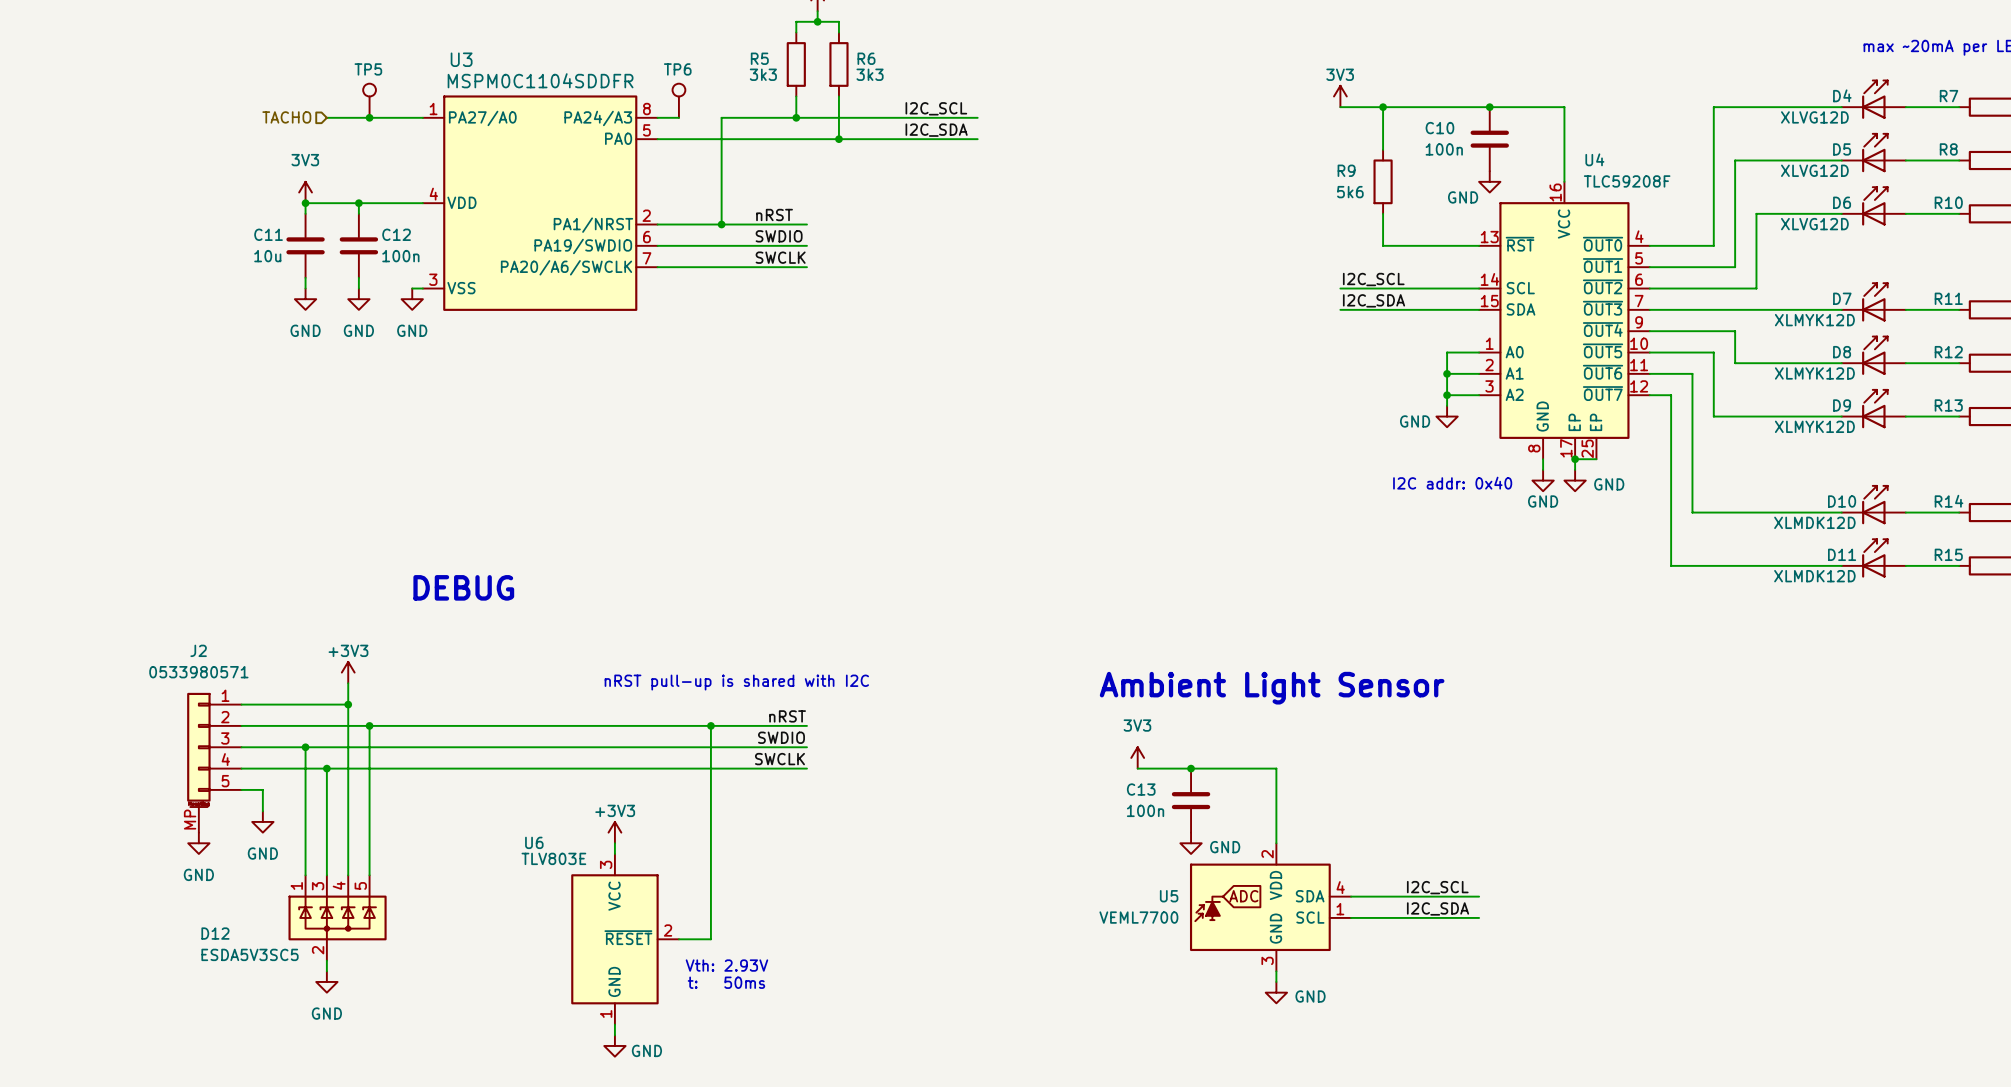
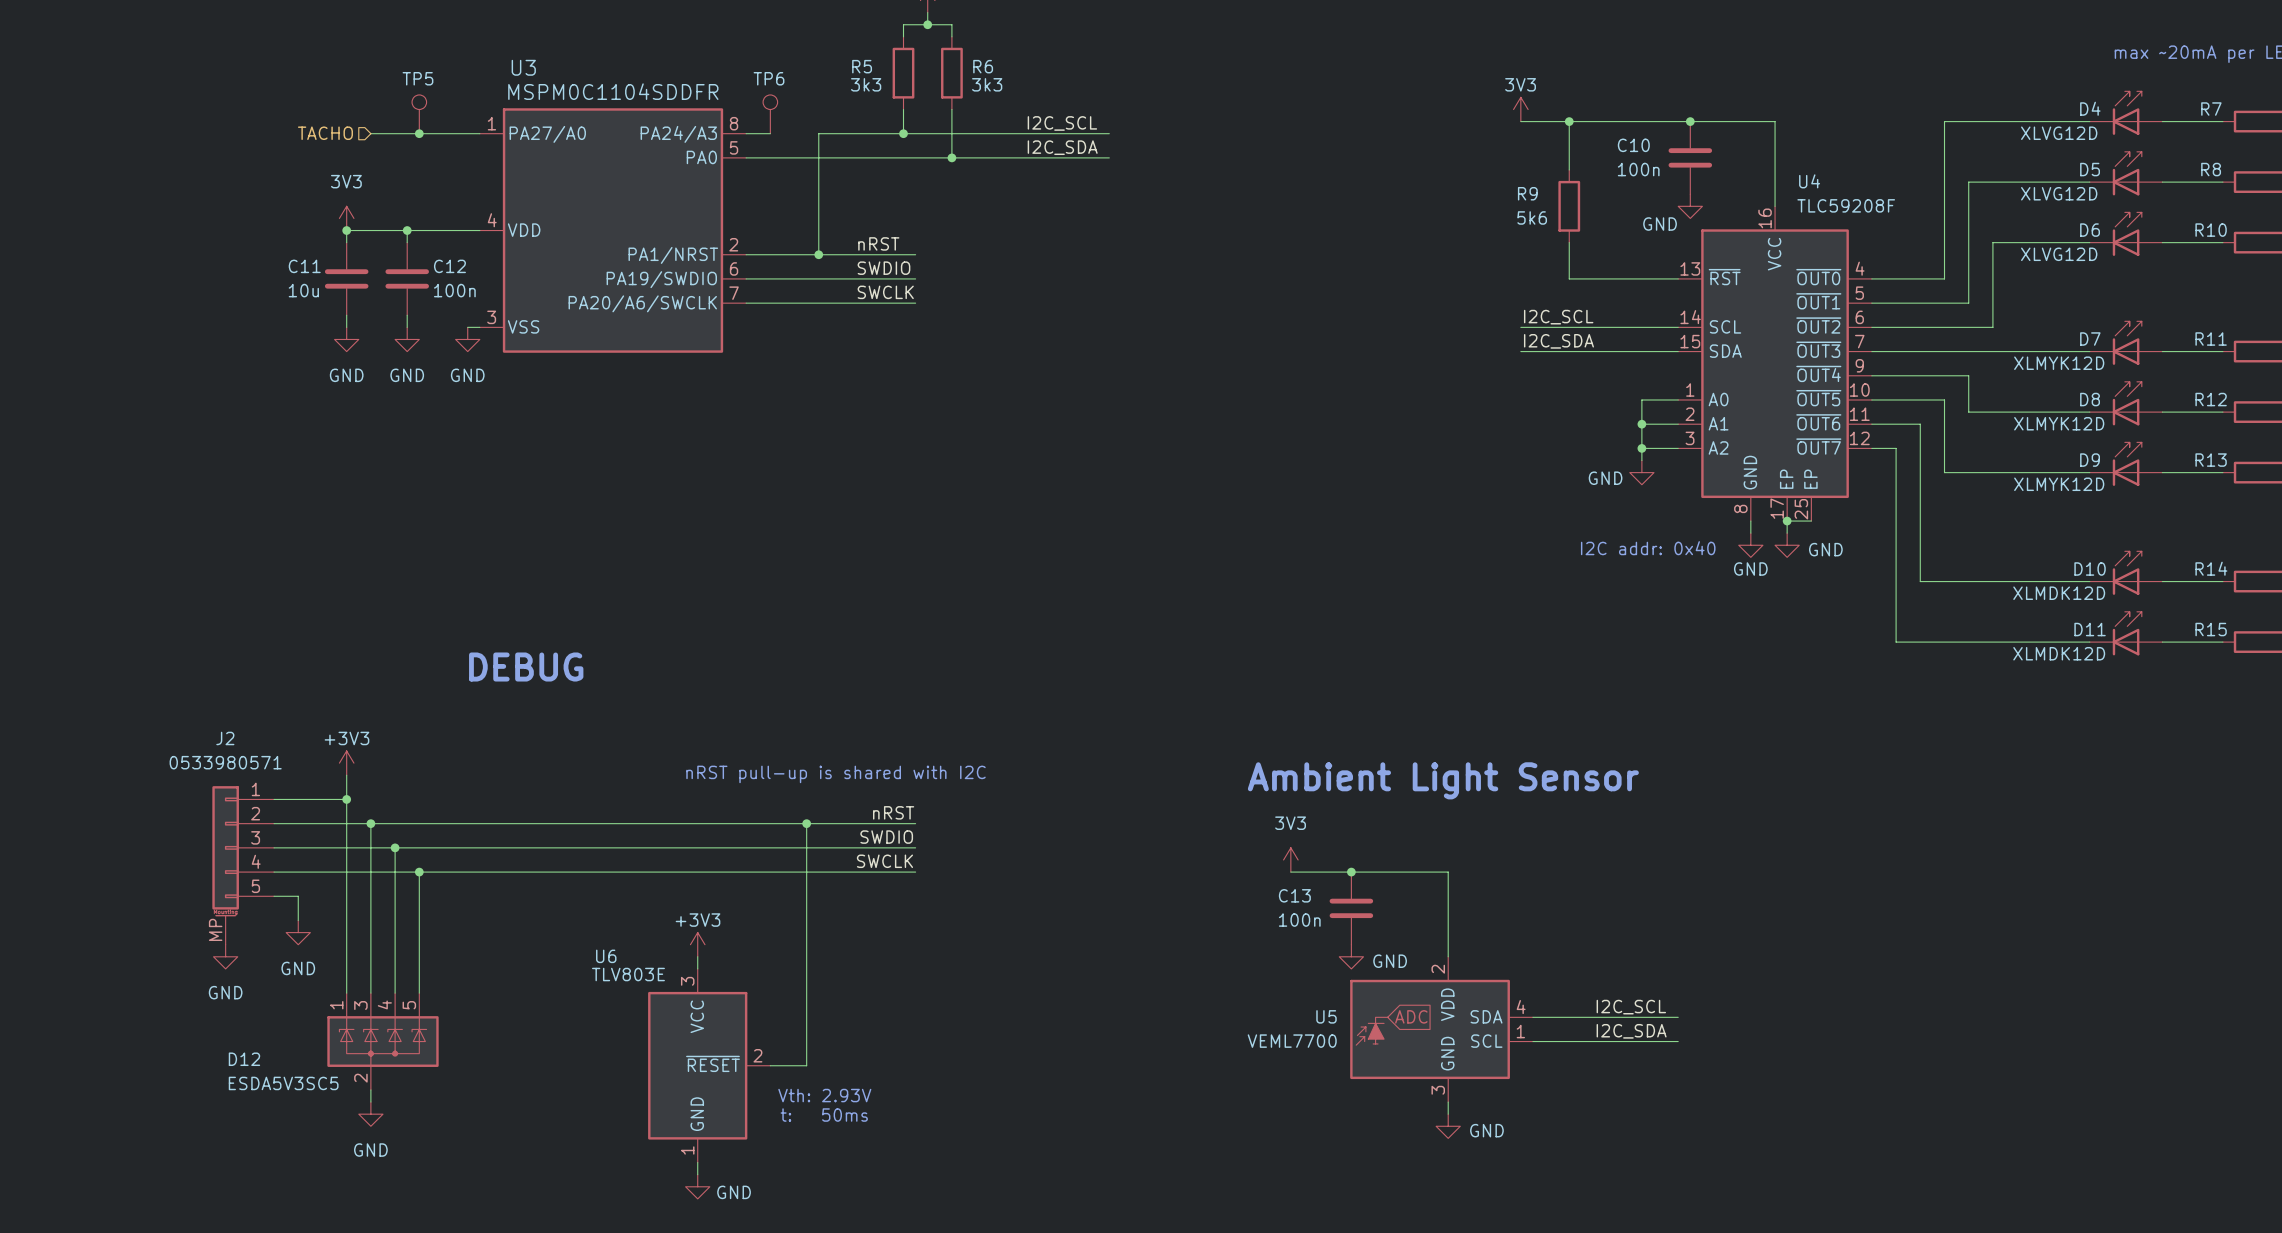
power symbol position: +3V3 (348, 672) -> +3V3 (346, 763)
wire: (348, 683) (348, 747) -> (346, 775) (346, 847)
wire: (305, 704) (348, 704) -> none
junction: none -> (346, 799)
junction: (348, 704) -> none
junction: none -> (370, 823)
wire: (369, 725) (369, 768) -> (370, 823) (370, 872)
junction: (369, 725) -> none
junction: (305, 747) -> none
junction: none -> (395, 847)
junction: (326, 768) -> none
junction: none -> (419, 872)

